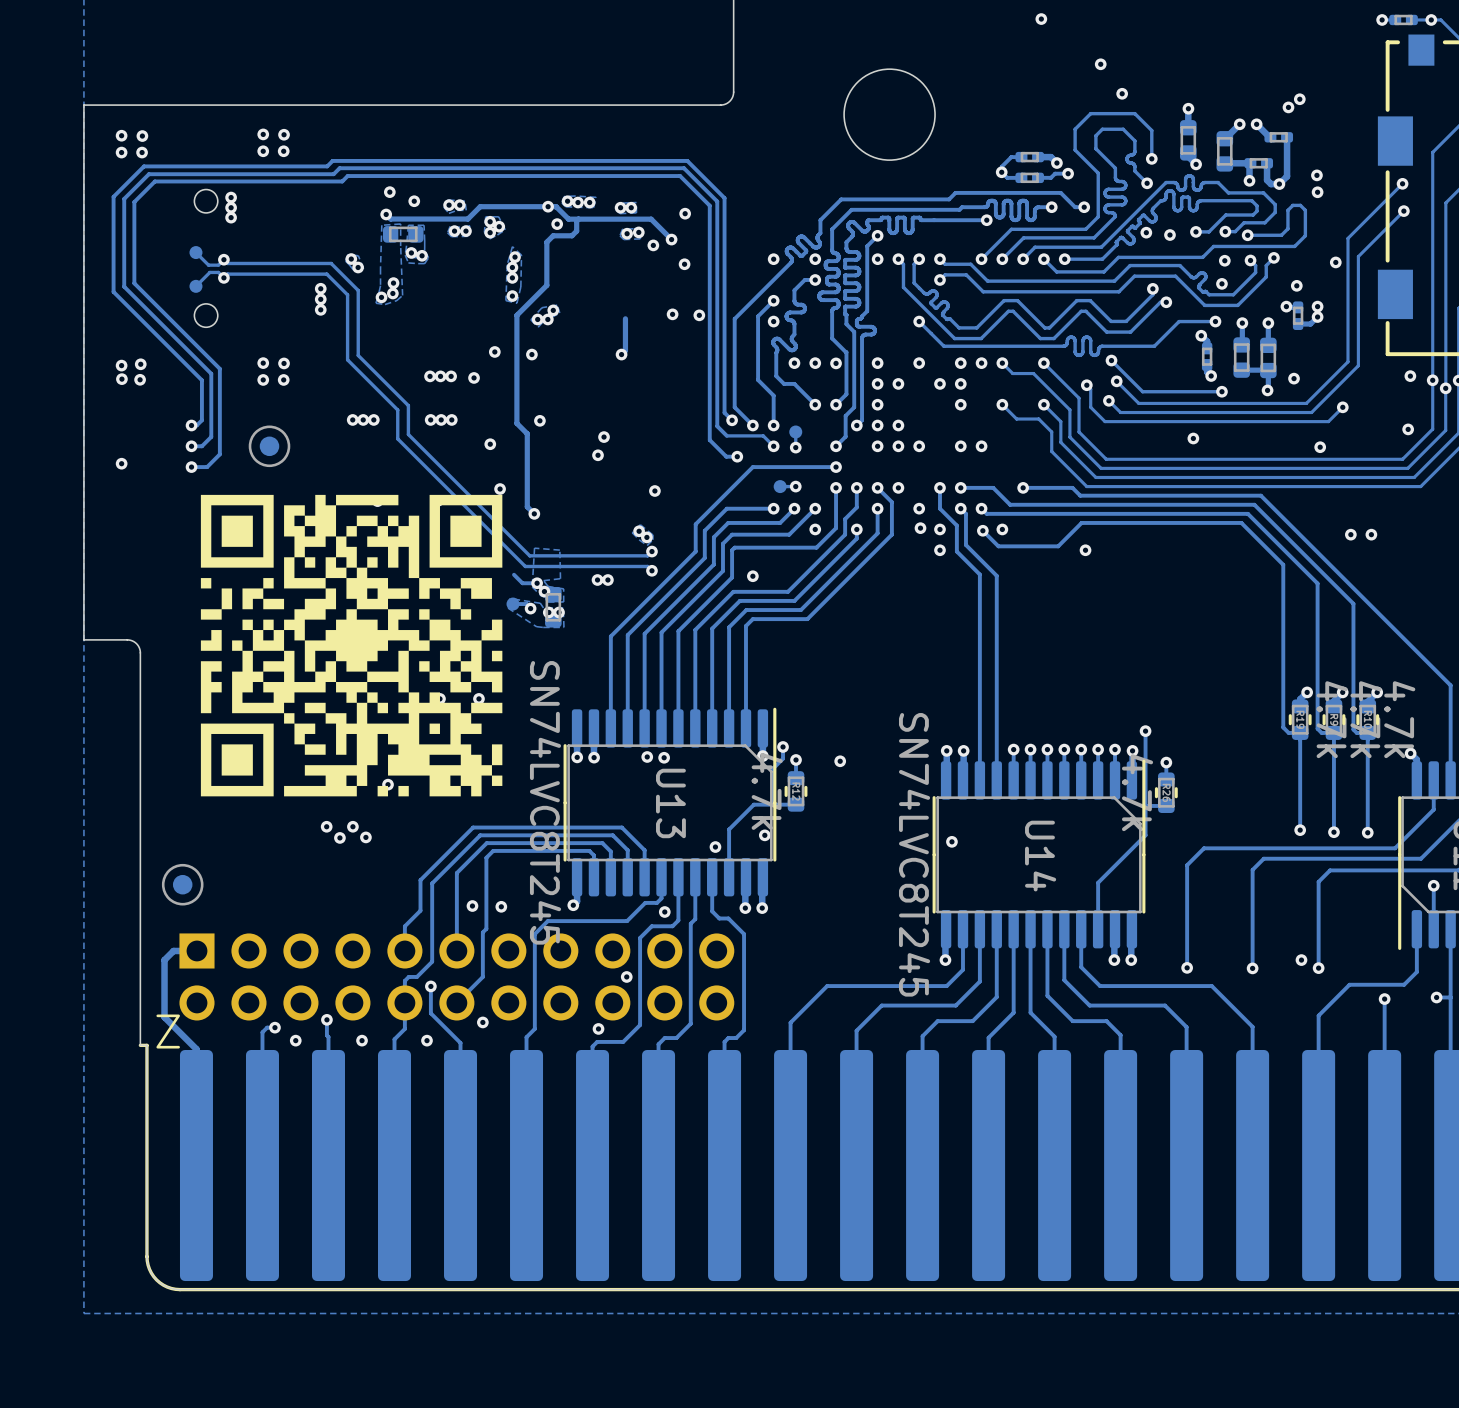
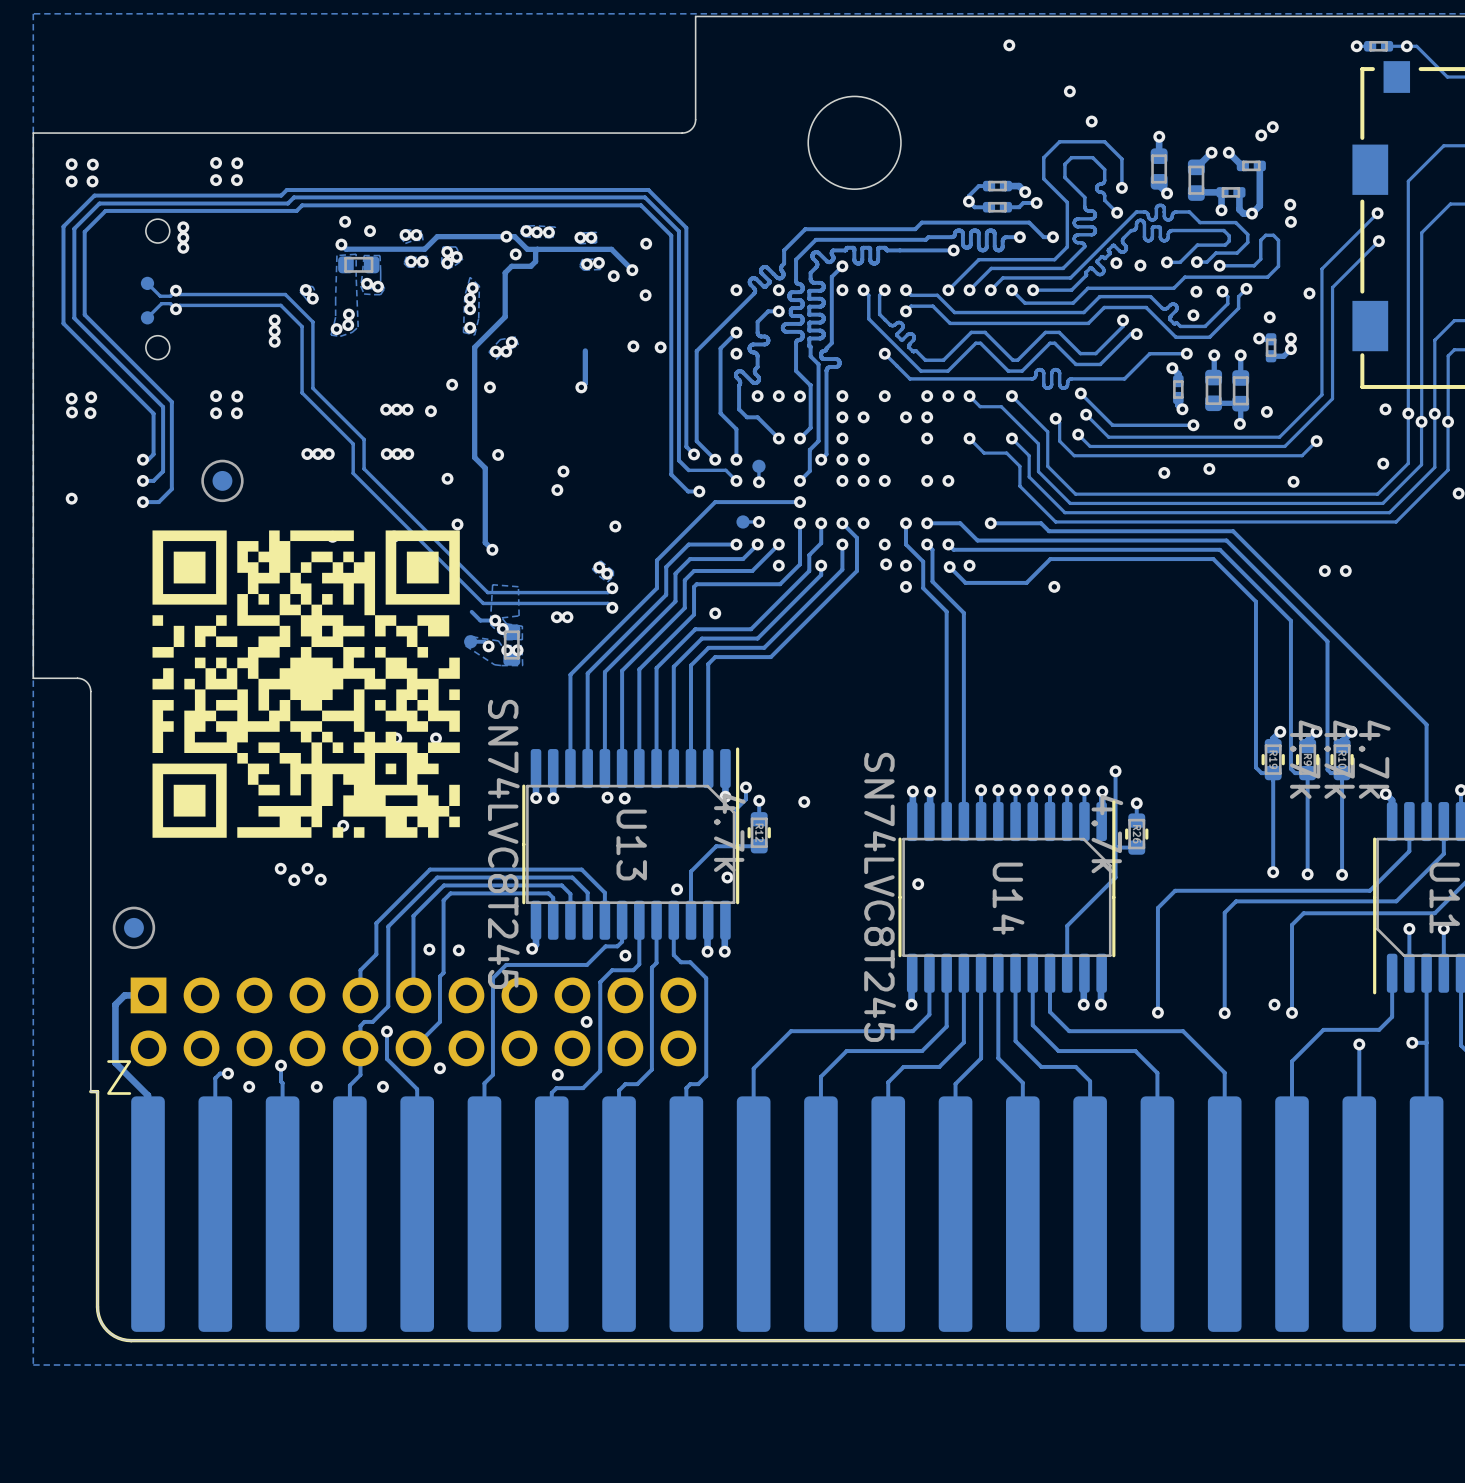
via: none -> (1209, 468)

